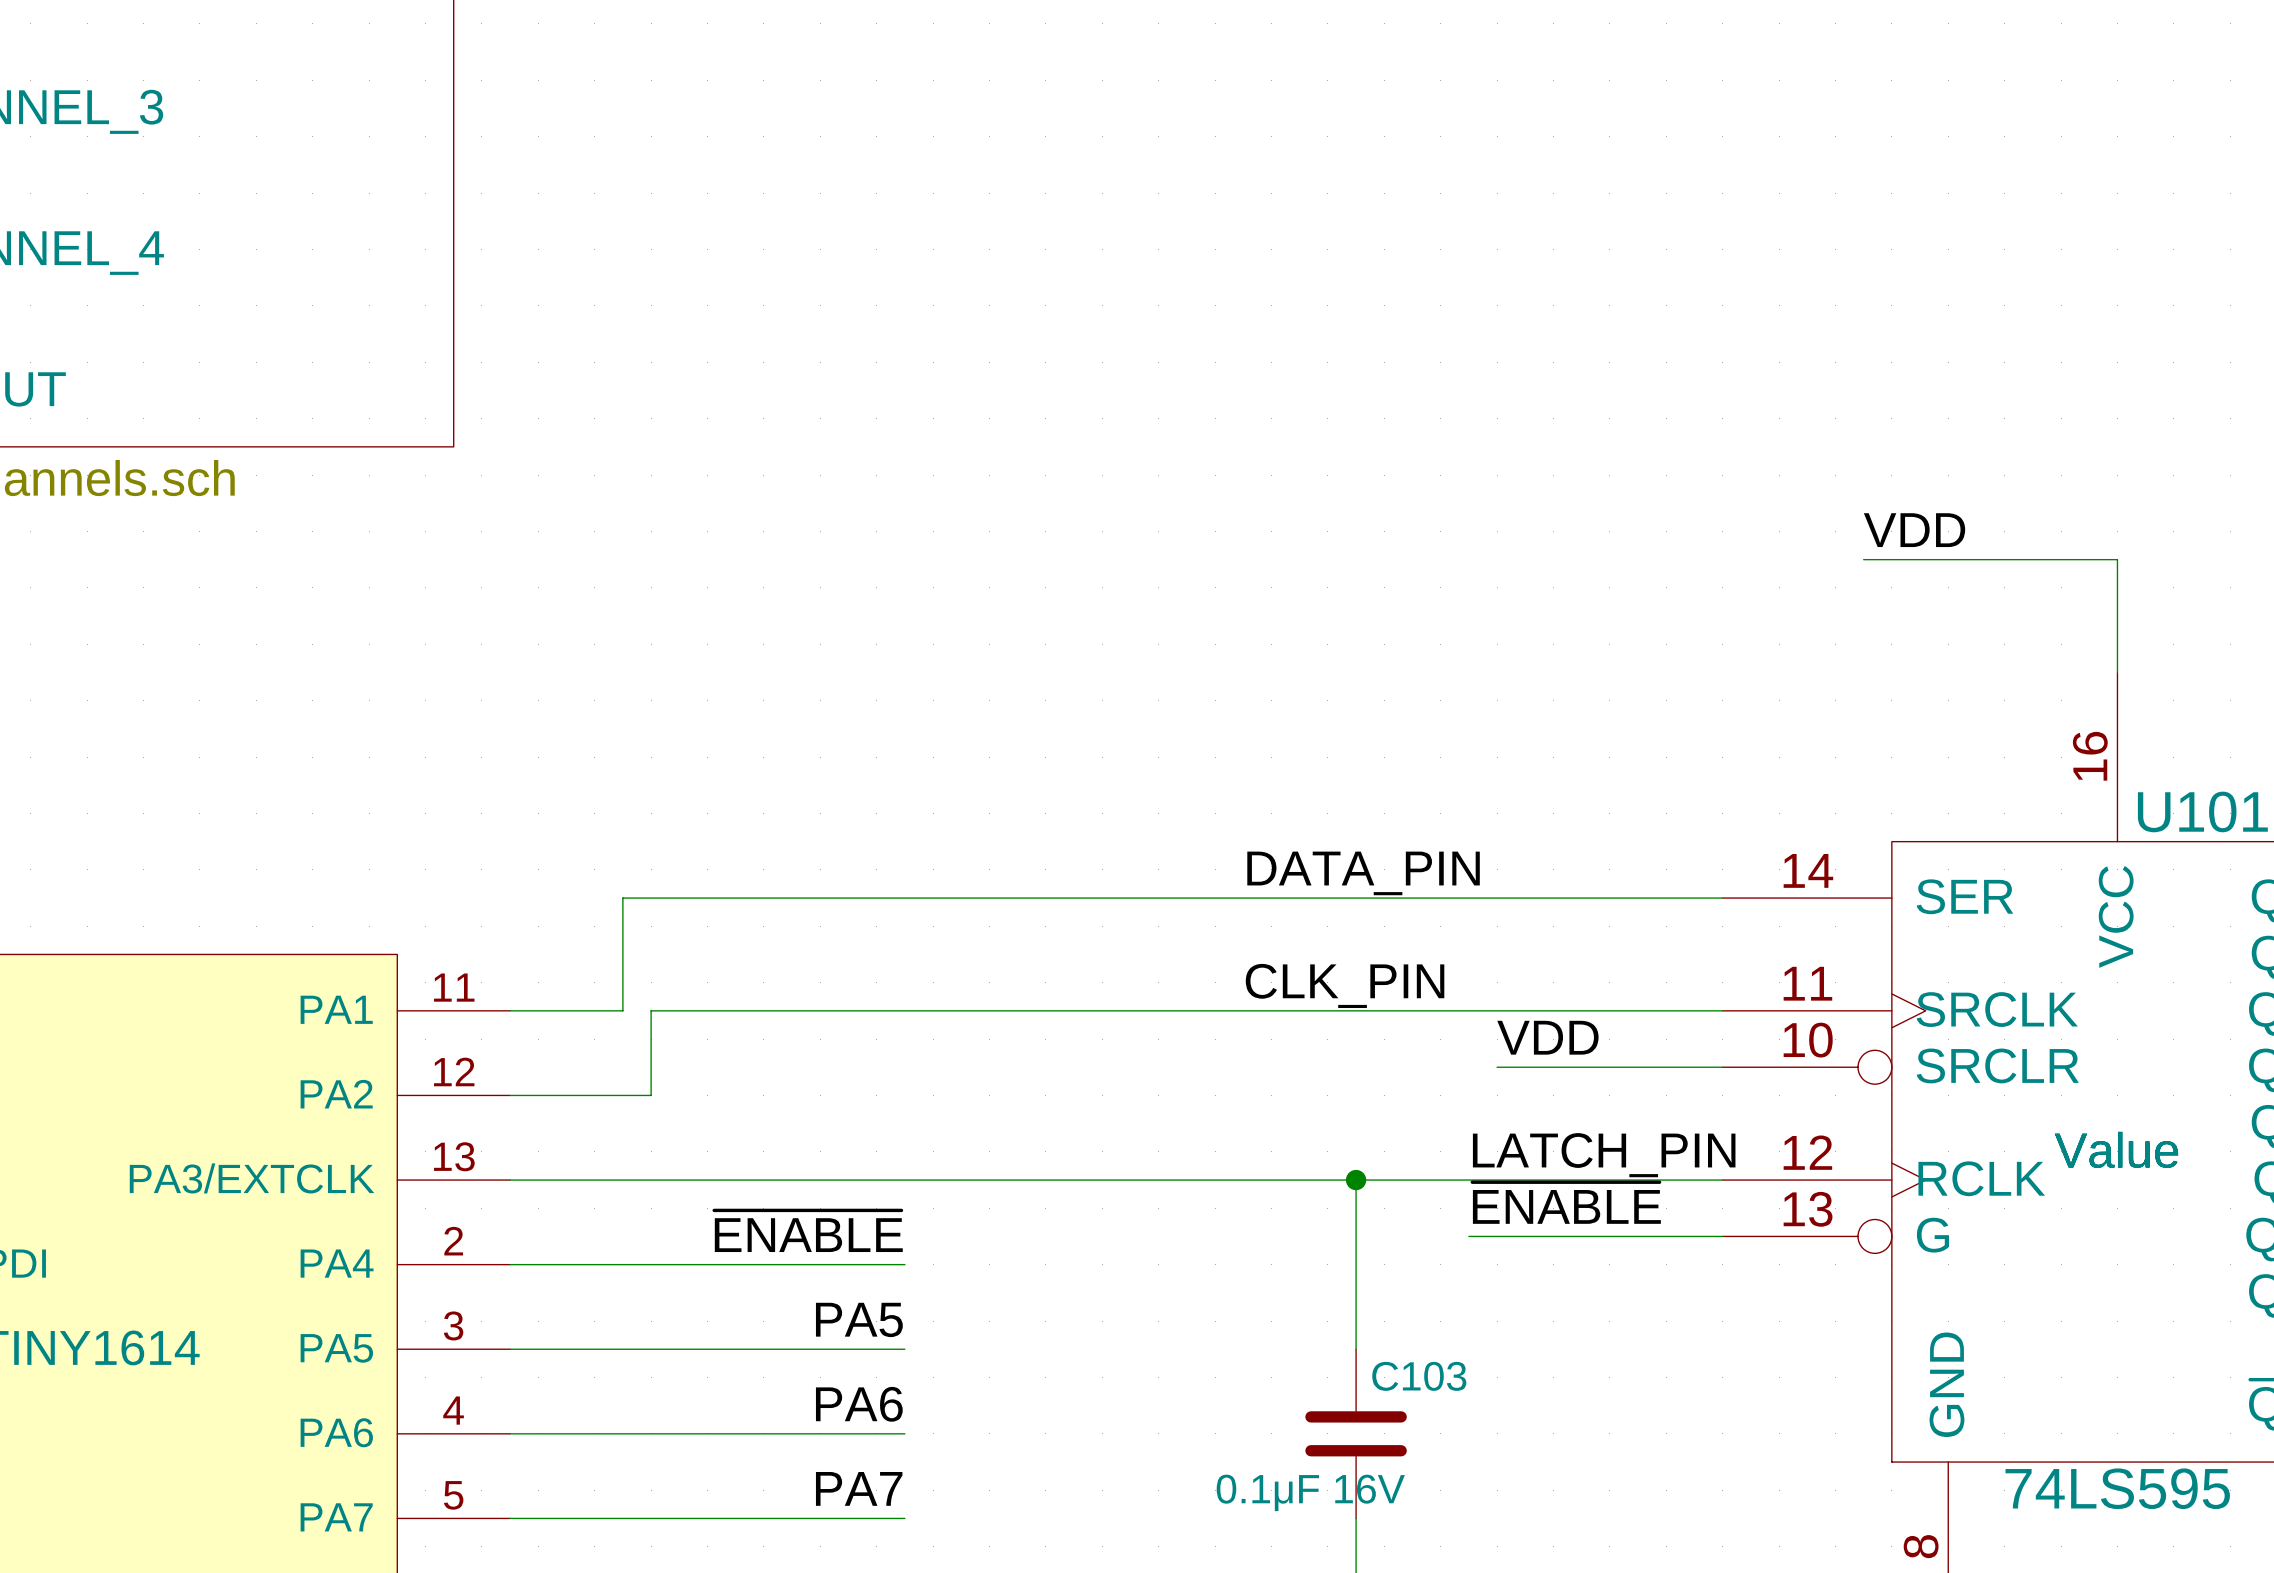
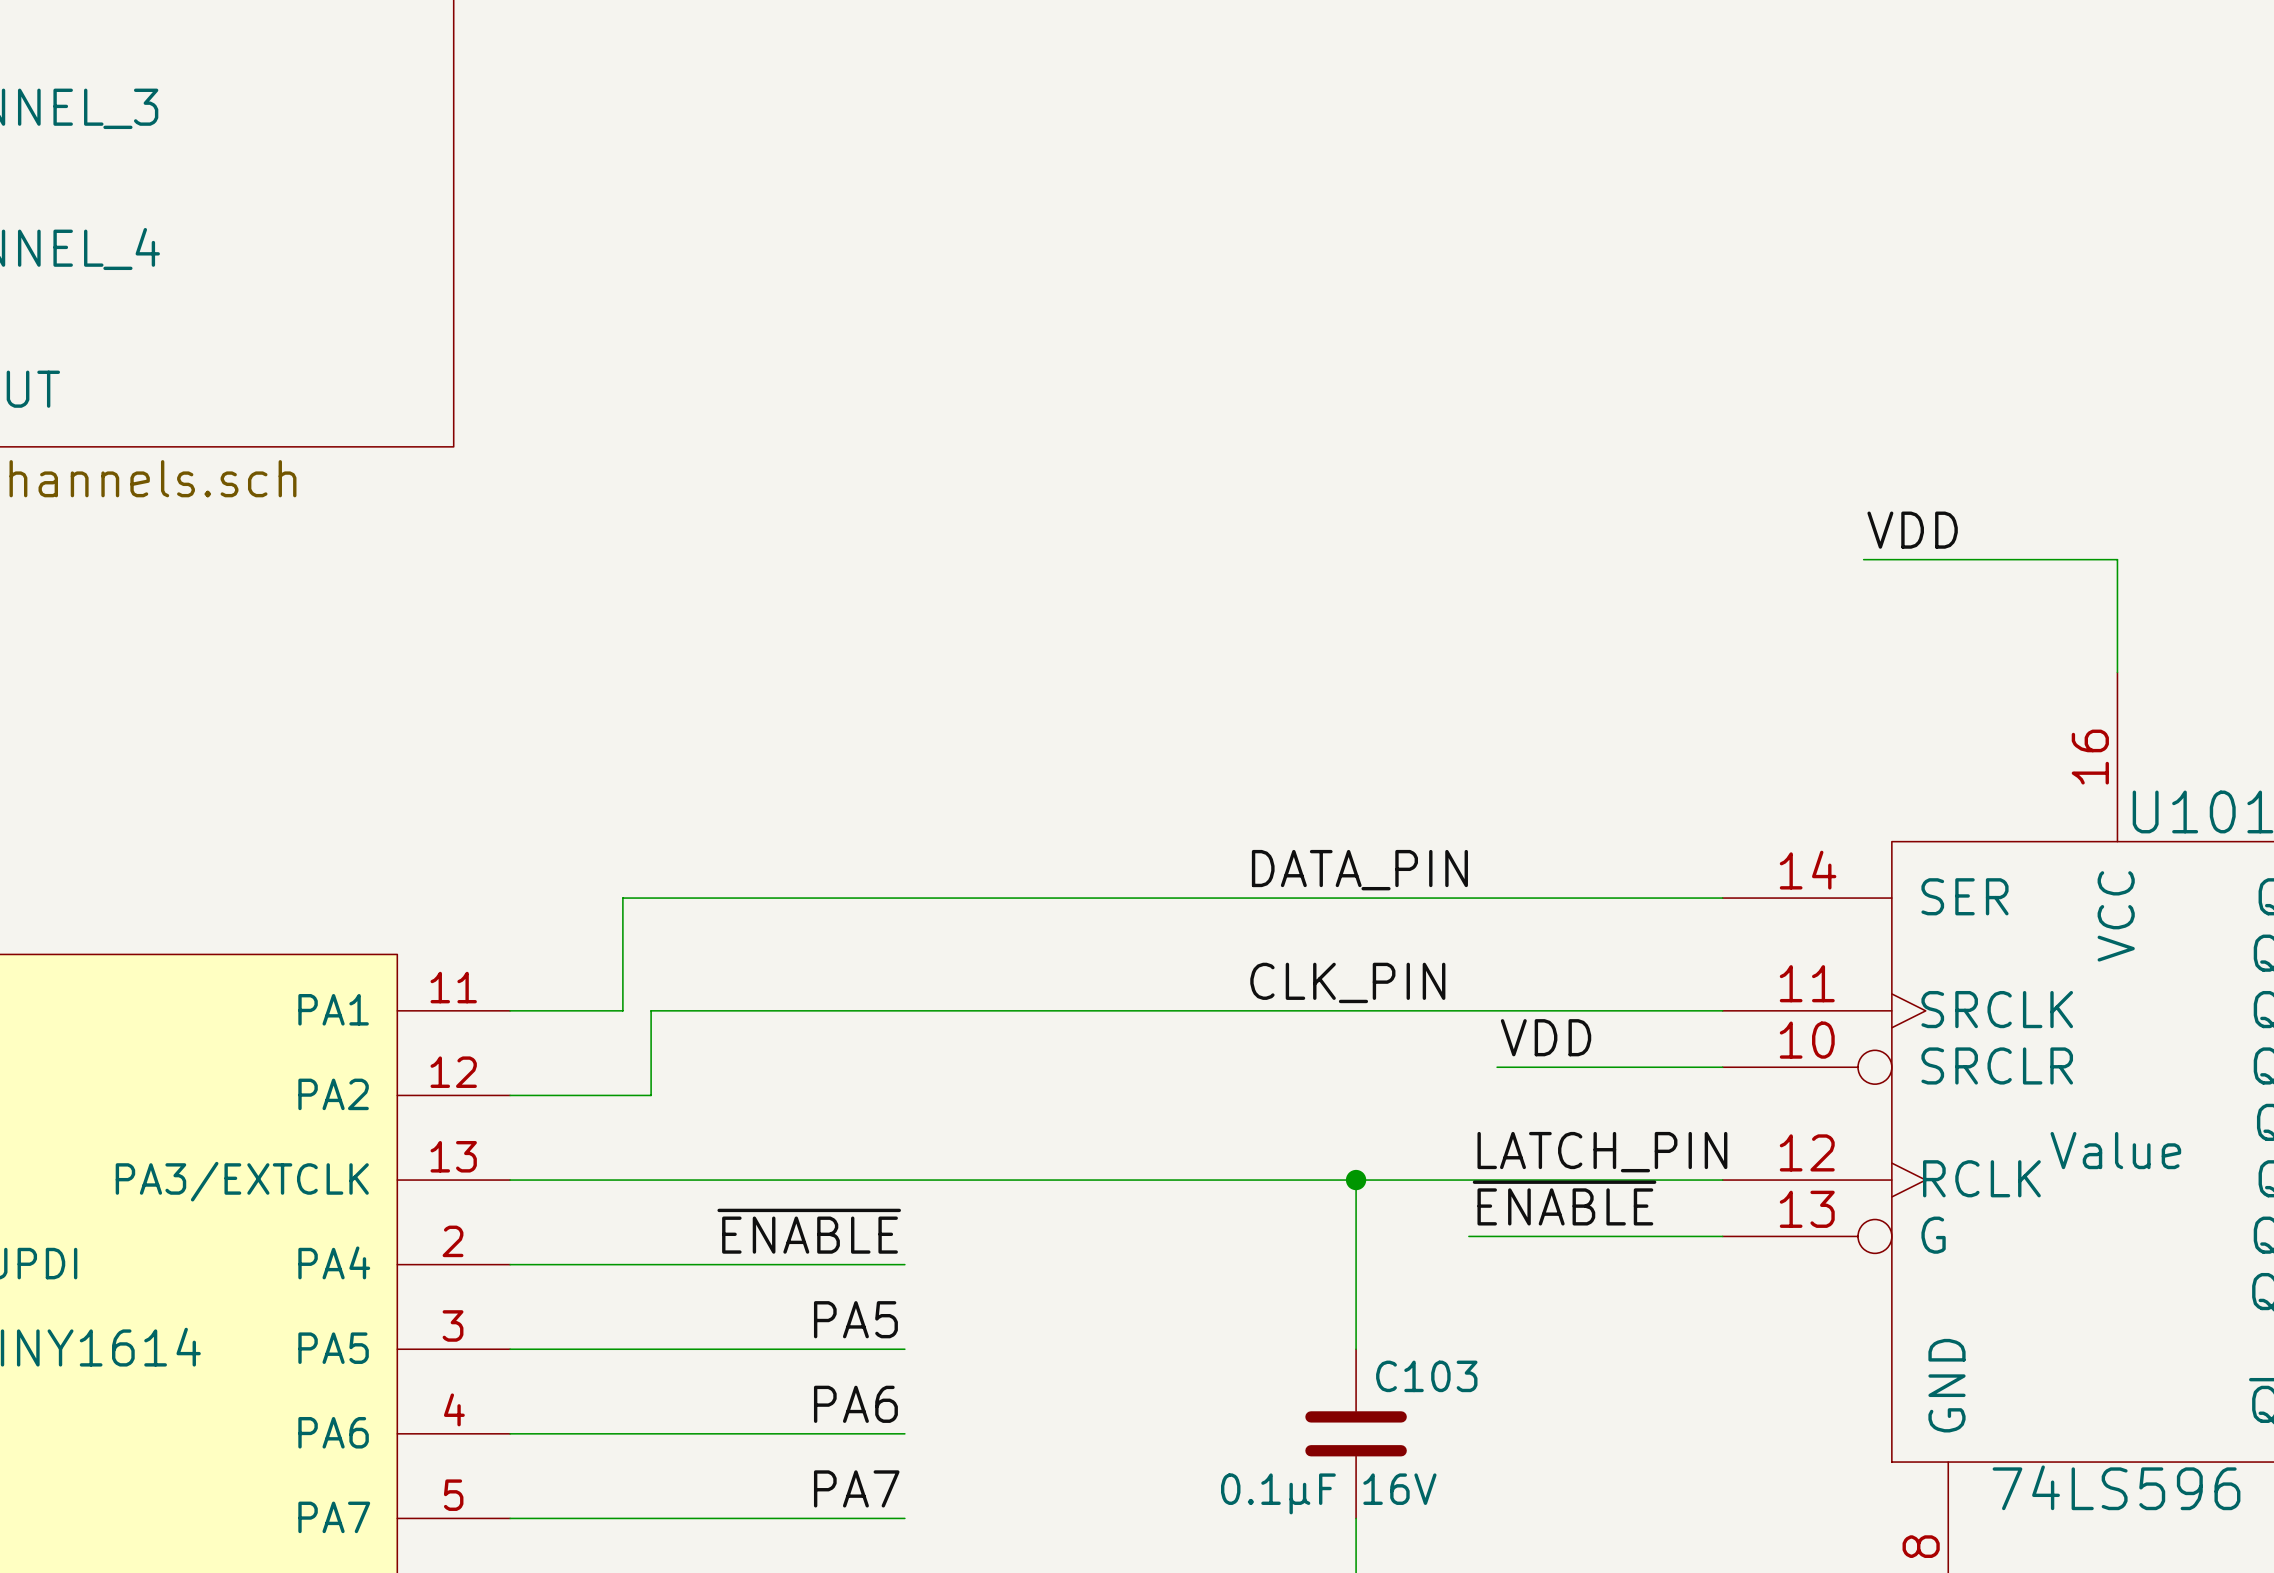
U101 text: Value (2116, 1149) -> none
U101 value: 74LS595 (2117, 1488) -> 74LS596 (2116, 1487)

